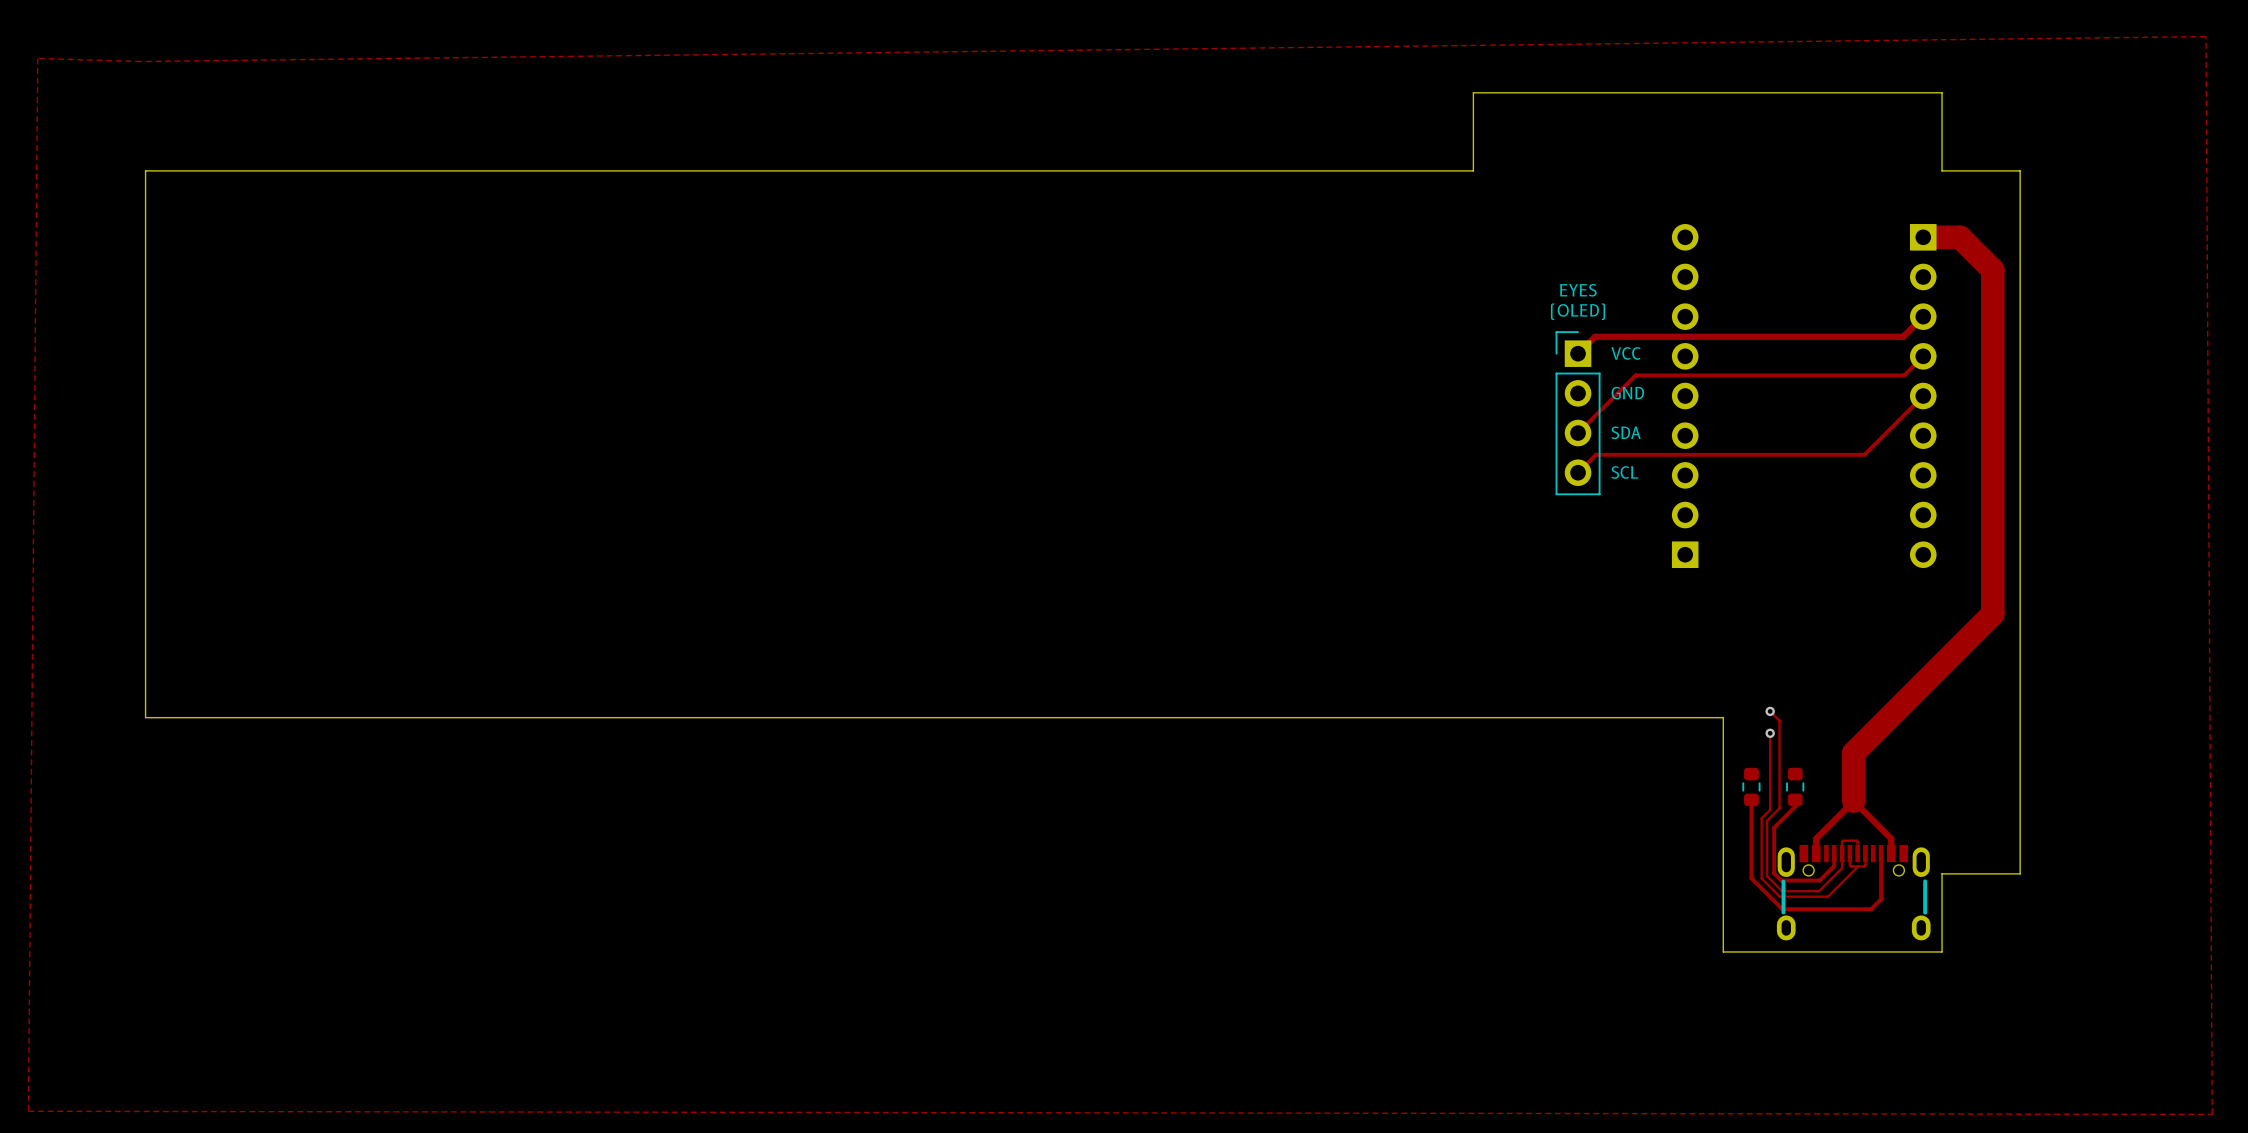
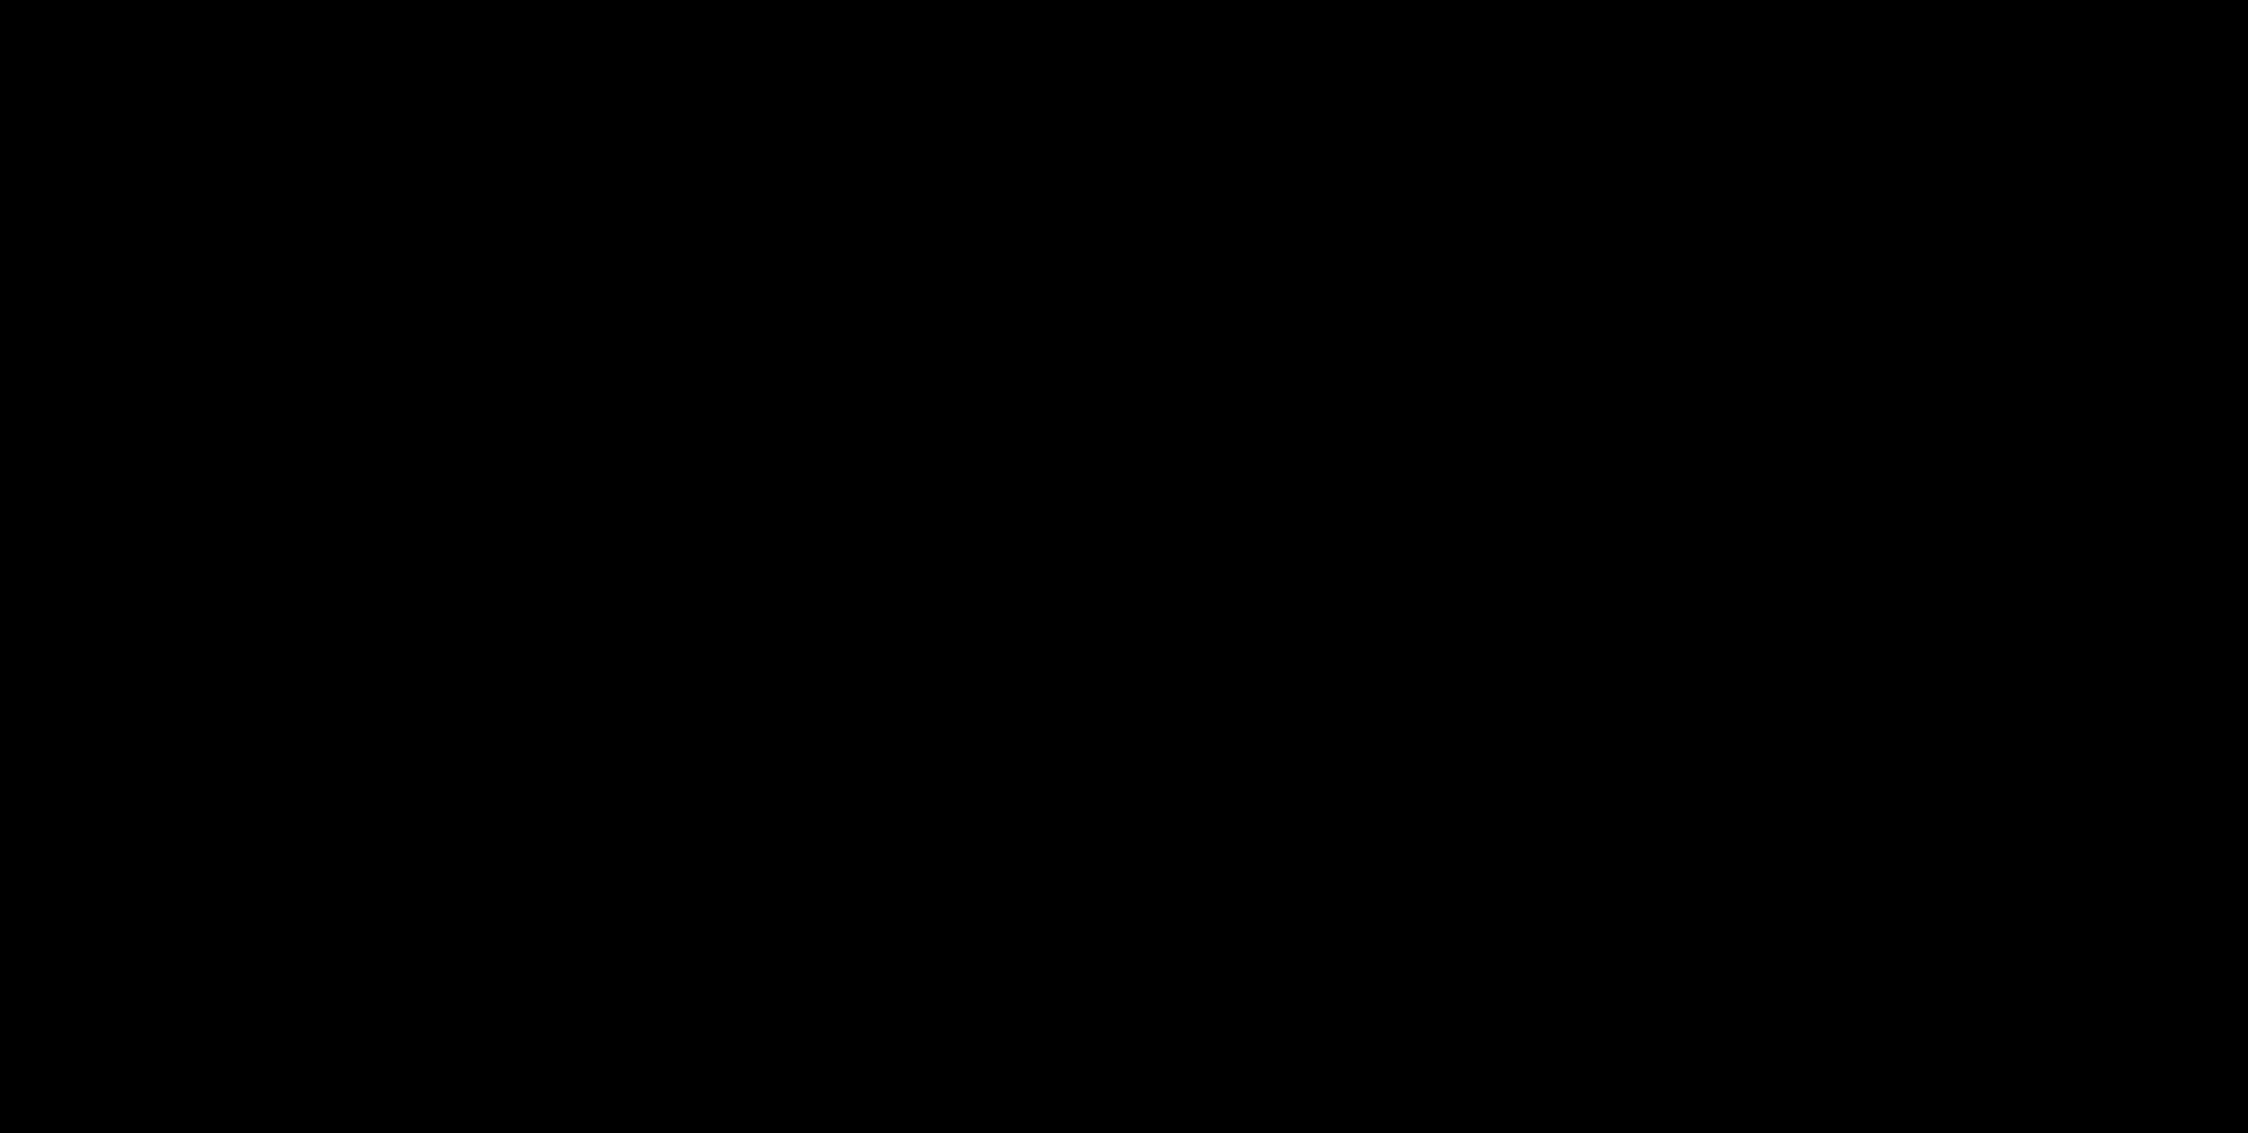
zone outline: (2206, 36) (2212, 1114) (28, 1111) (37, 58) (140, 61) (2206, 36) -> none
board edge: (1473, 92) (1942, 92) (1942, 170) (2020, 170) (2020, 873) (1942, 873) (1942, 951) (1723, 951) (1723, 717) (145, 717) (145, 170) (1473, 170) (1473, 92) -> none
track: (1923, 237) (1959, 237) (1992, 270) (1992, 613) (1853, 752) (1853, 801) -> none
text: EYES (1578, 290) -> none
text: (OLED) (1578, 311) -> none
track: (1923, 316) (1903, 336) (1594, 336) (1578, 353) -> none
text: VCC (1626, 353) -> none
track: (1923, 356) (1904, 375) (1635, 375) (1578, 433) -> none
text: GND (1627, 393) -> none
part: (1685, 396) -> none
track: (1923, 396) (1864, 454) (1595, 454) (1578, 472) -> none
part: (1923, 396) -> none
part: (1578, 413) -> none
text: SDA (1626, 432) -> none
text: SCL (1624, 472) -> none
track: (1770, 711) (1779, 720) (1779, 808) (1767, 820) (1767, 876) (1782, 891) (1819, 891) (1842, 868) (1843, 840) (1856, 840) (1857, 853) -> none
via: (1770, 711) -> none
track: (1770, 733) (1770, 809) (1761, 818) (1761, 878) (1779, 896) (1827, 896) (1858, 866) -> none
via: (1770, 733) -> none
part: (1751, 786) -> none
part: (1795, 786) -> none
track: (1751, 799) (1751, 878) (1782, 909) (1871, 909) (1881, 899) (1881, 853) -> none
track: (1795, 799) (1795, 806) (1774, 827) (1774, 873) (1781, 880) (1819, 880) (1834, 866) (1834, 853) -> none
track: (1853, 801) (1816, 838) (1816, 853) -> none
track: (1853, 801) (1891, 838) (1891, 853) -> none
track: (1849, 853) (1851, 866) (1864, 866) (1865, 853) -> none
part: (1853, 892) -> none

